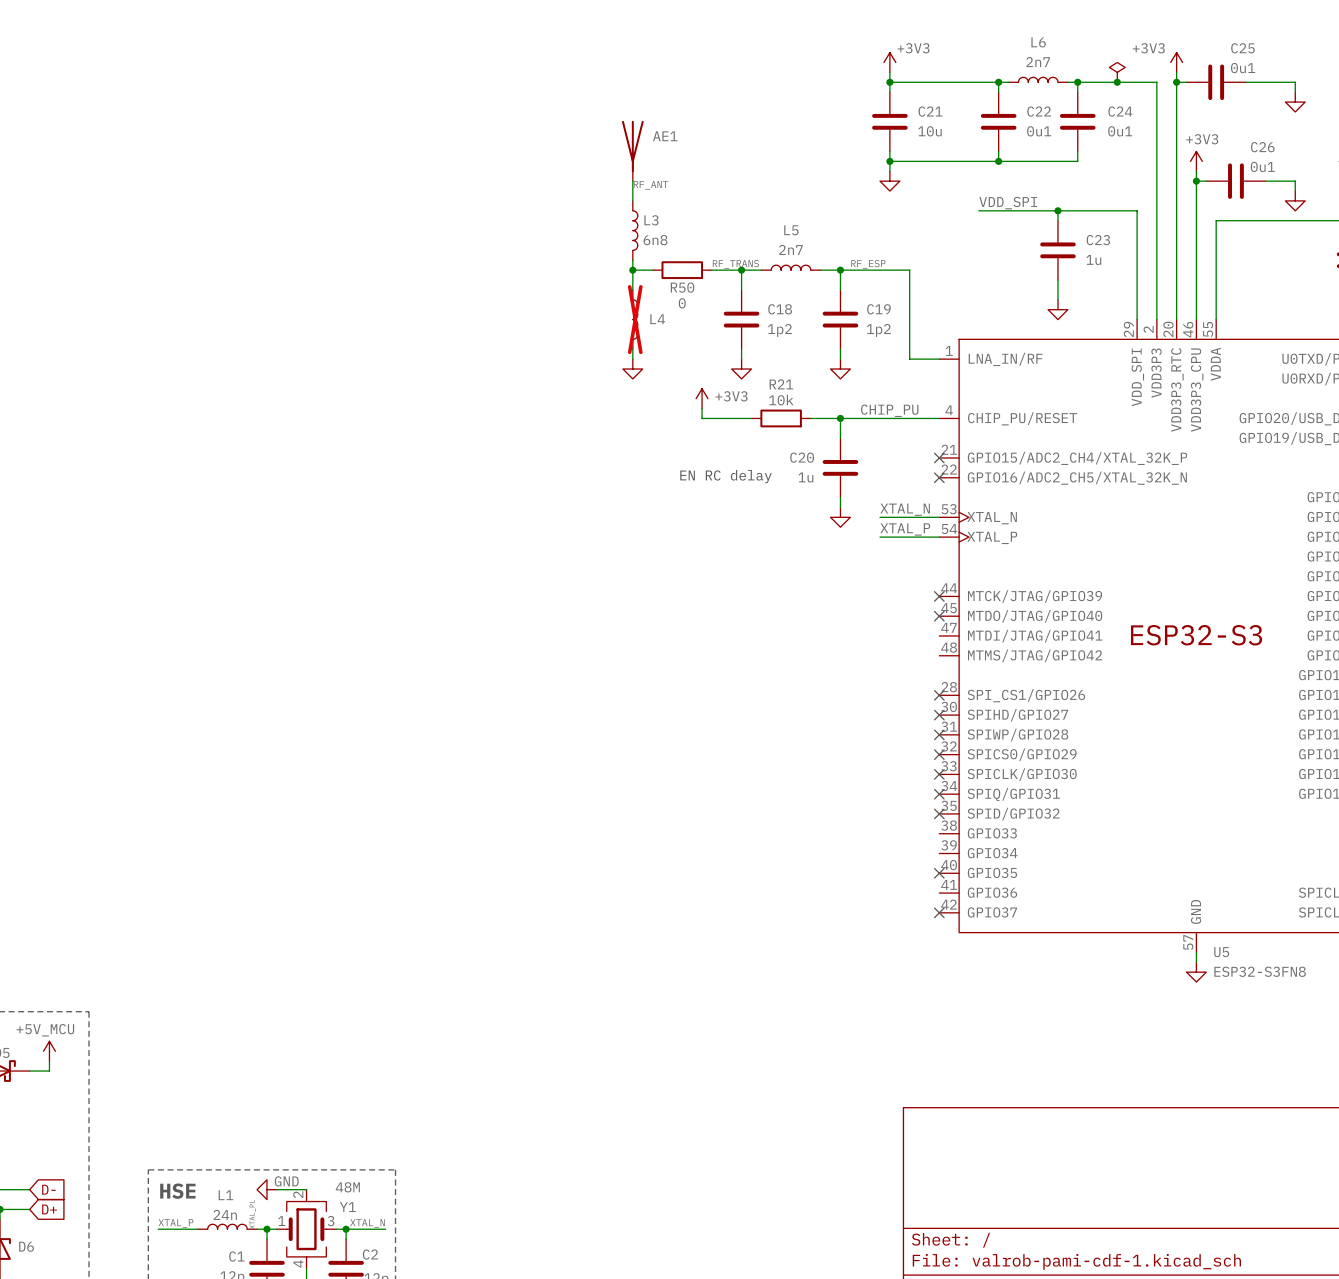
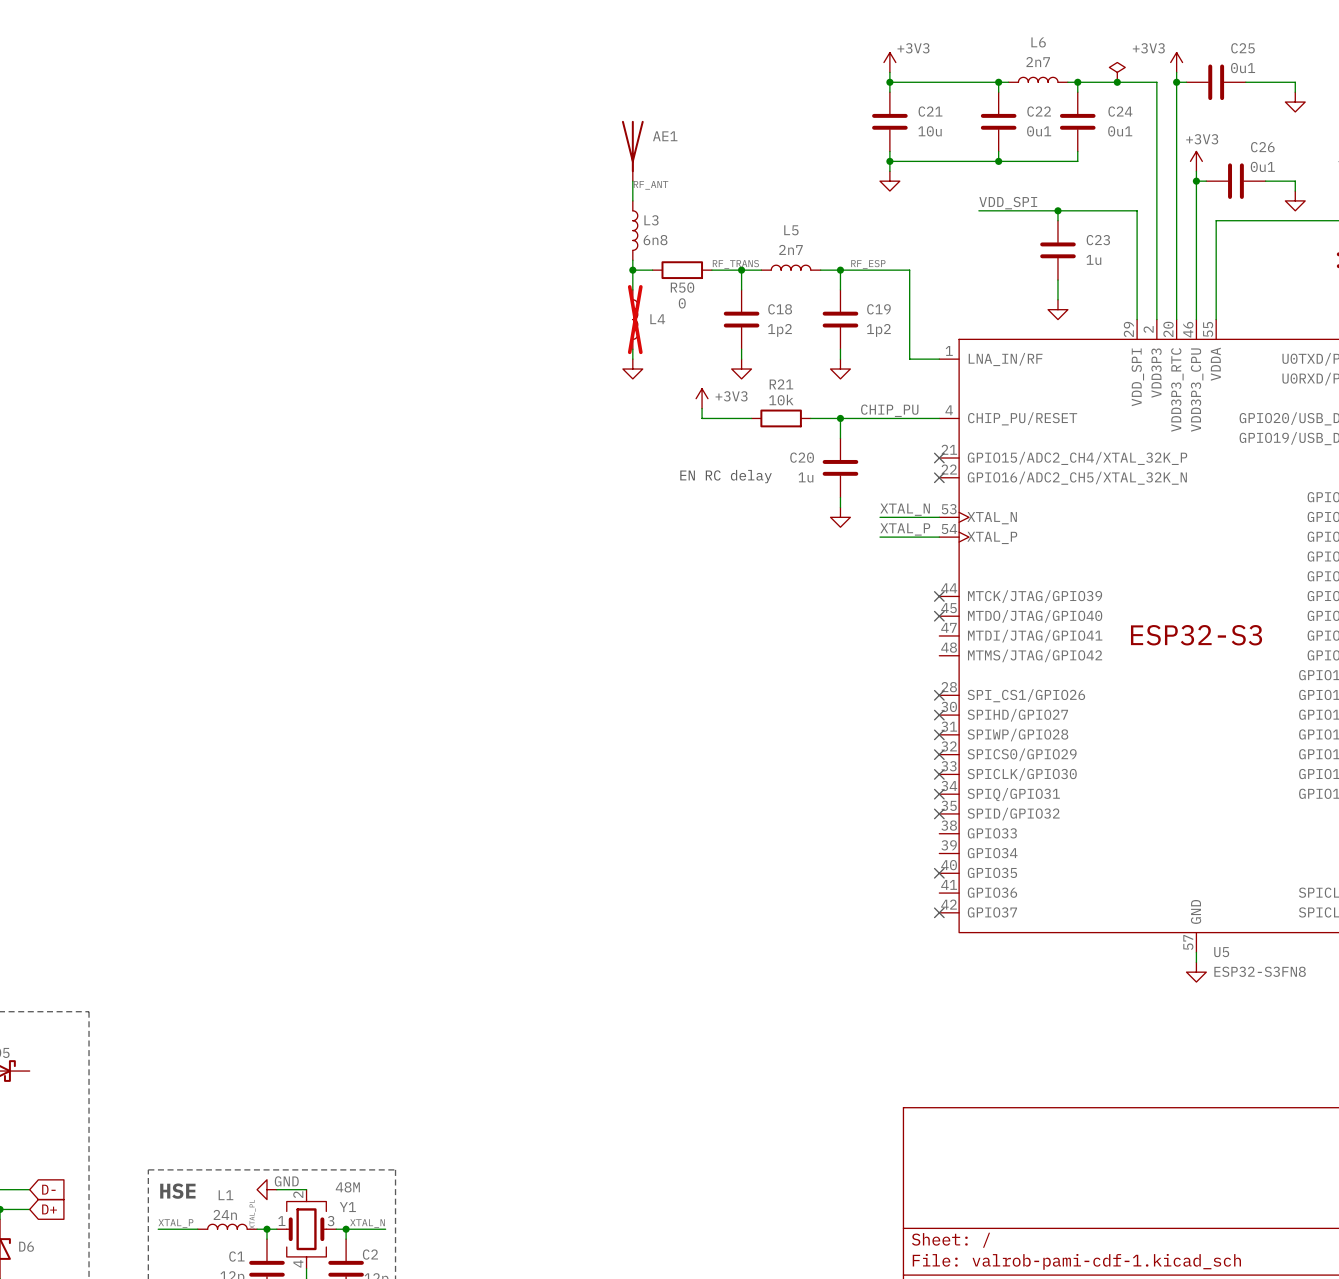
power symbol: +5V_MCU (49, 1051) -> none
wire: (49, 1061) (49, 1071) (29, 1071) -> none

